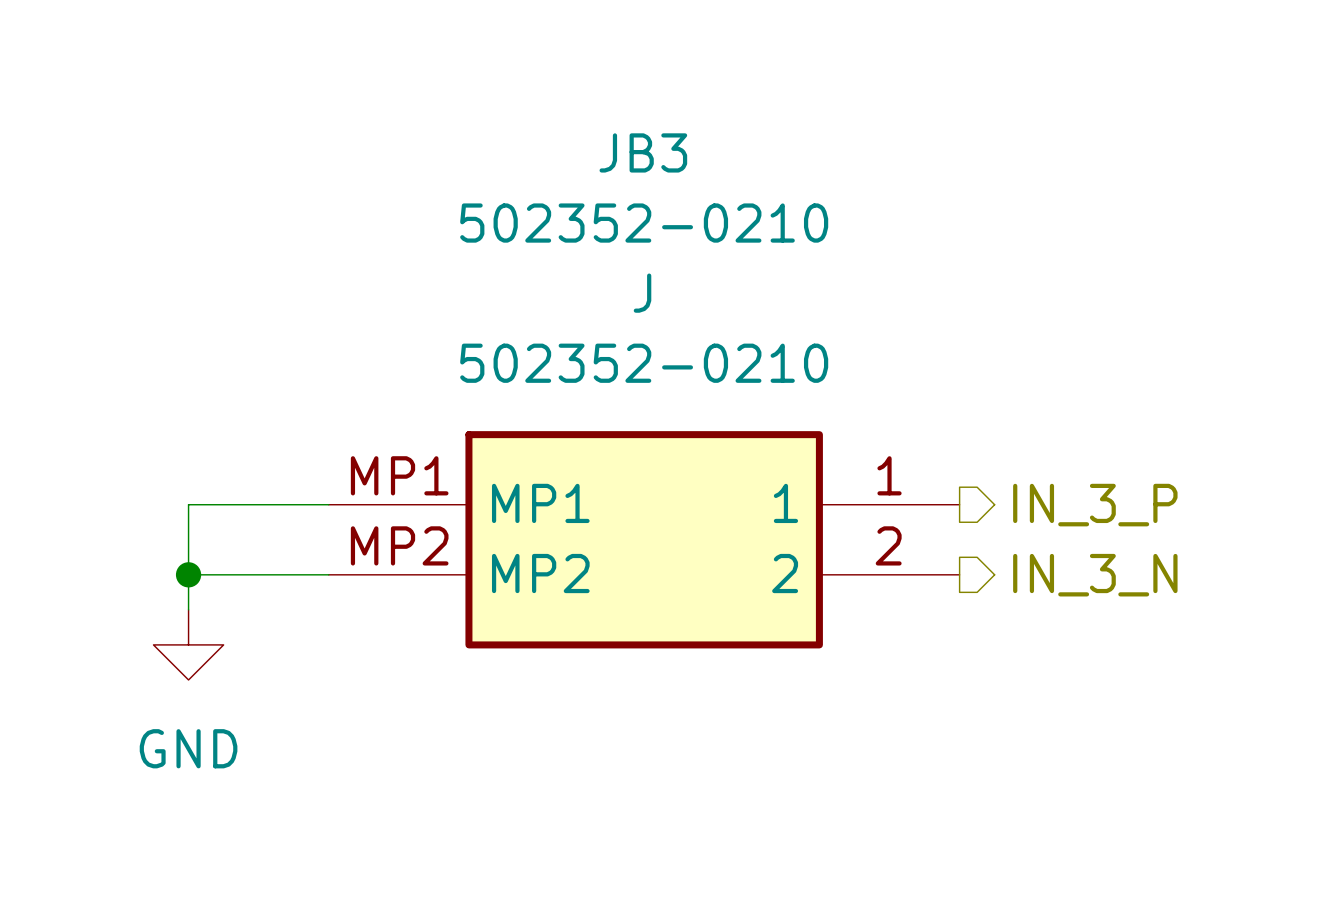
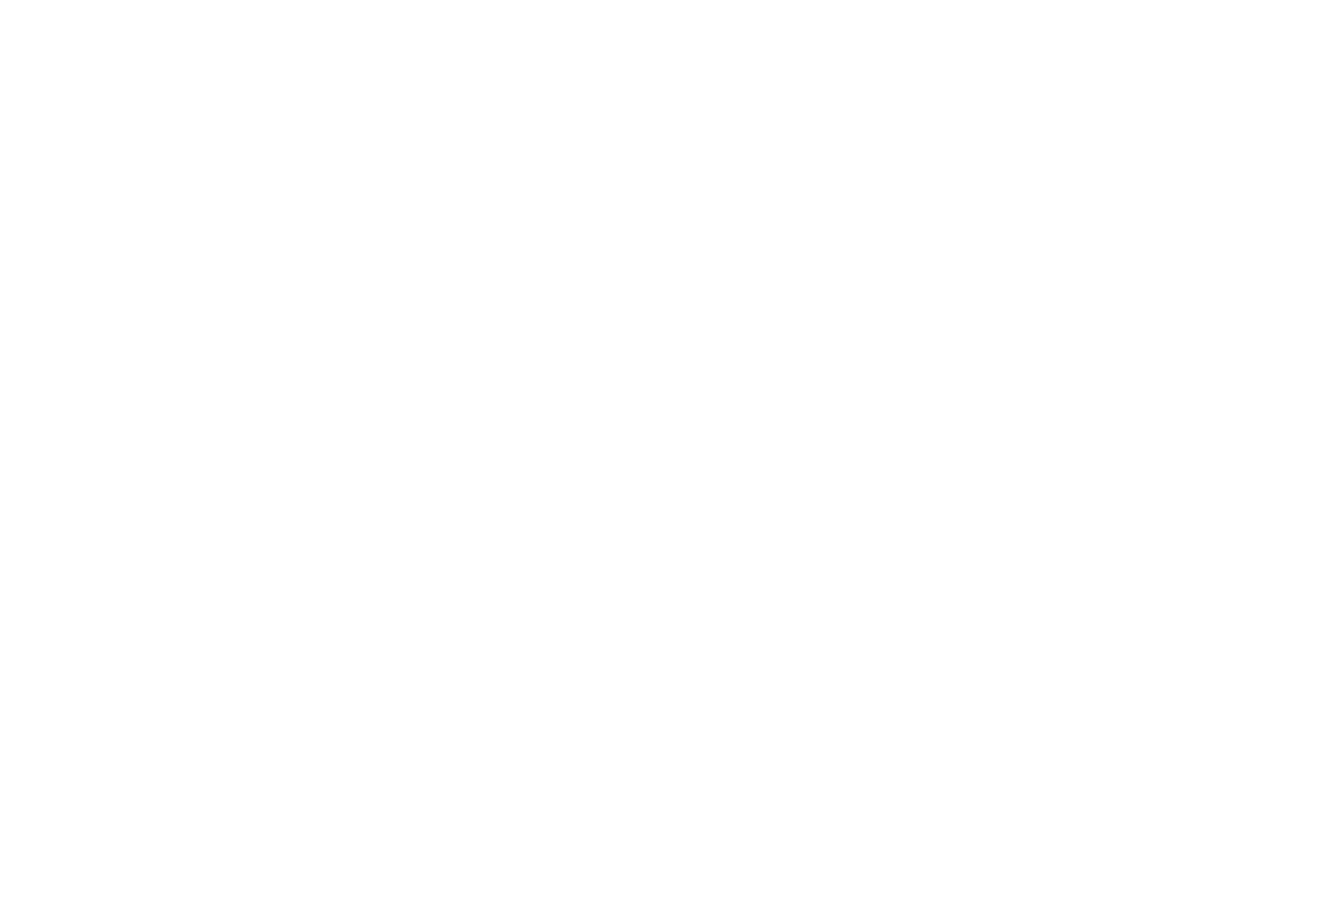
wire: (328, 504) (188, 504) (188, 609) -> none
hierarchical label: IN_3_P (1095, 505) -> none
JB3: 502352-0210 (644, 539) -> none
wire: (188, 574) (328, 574) -> none
junction: (188, 574) -> none
hierarchical label: IN_3_N (1095, 575) -> none
power symbol: GND (188, 644) -> none

